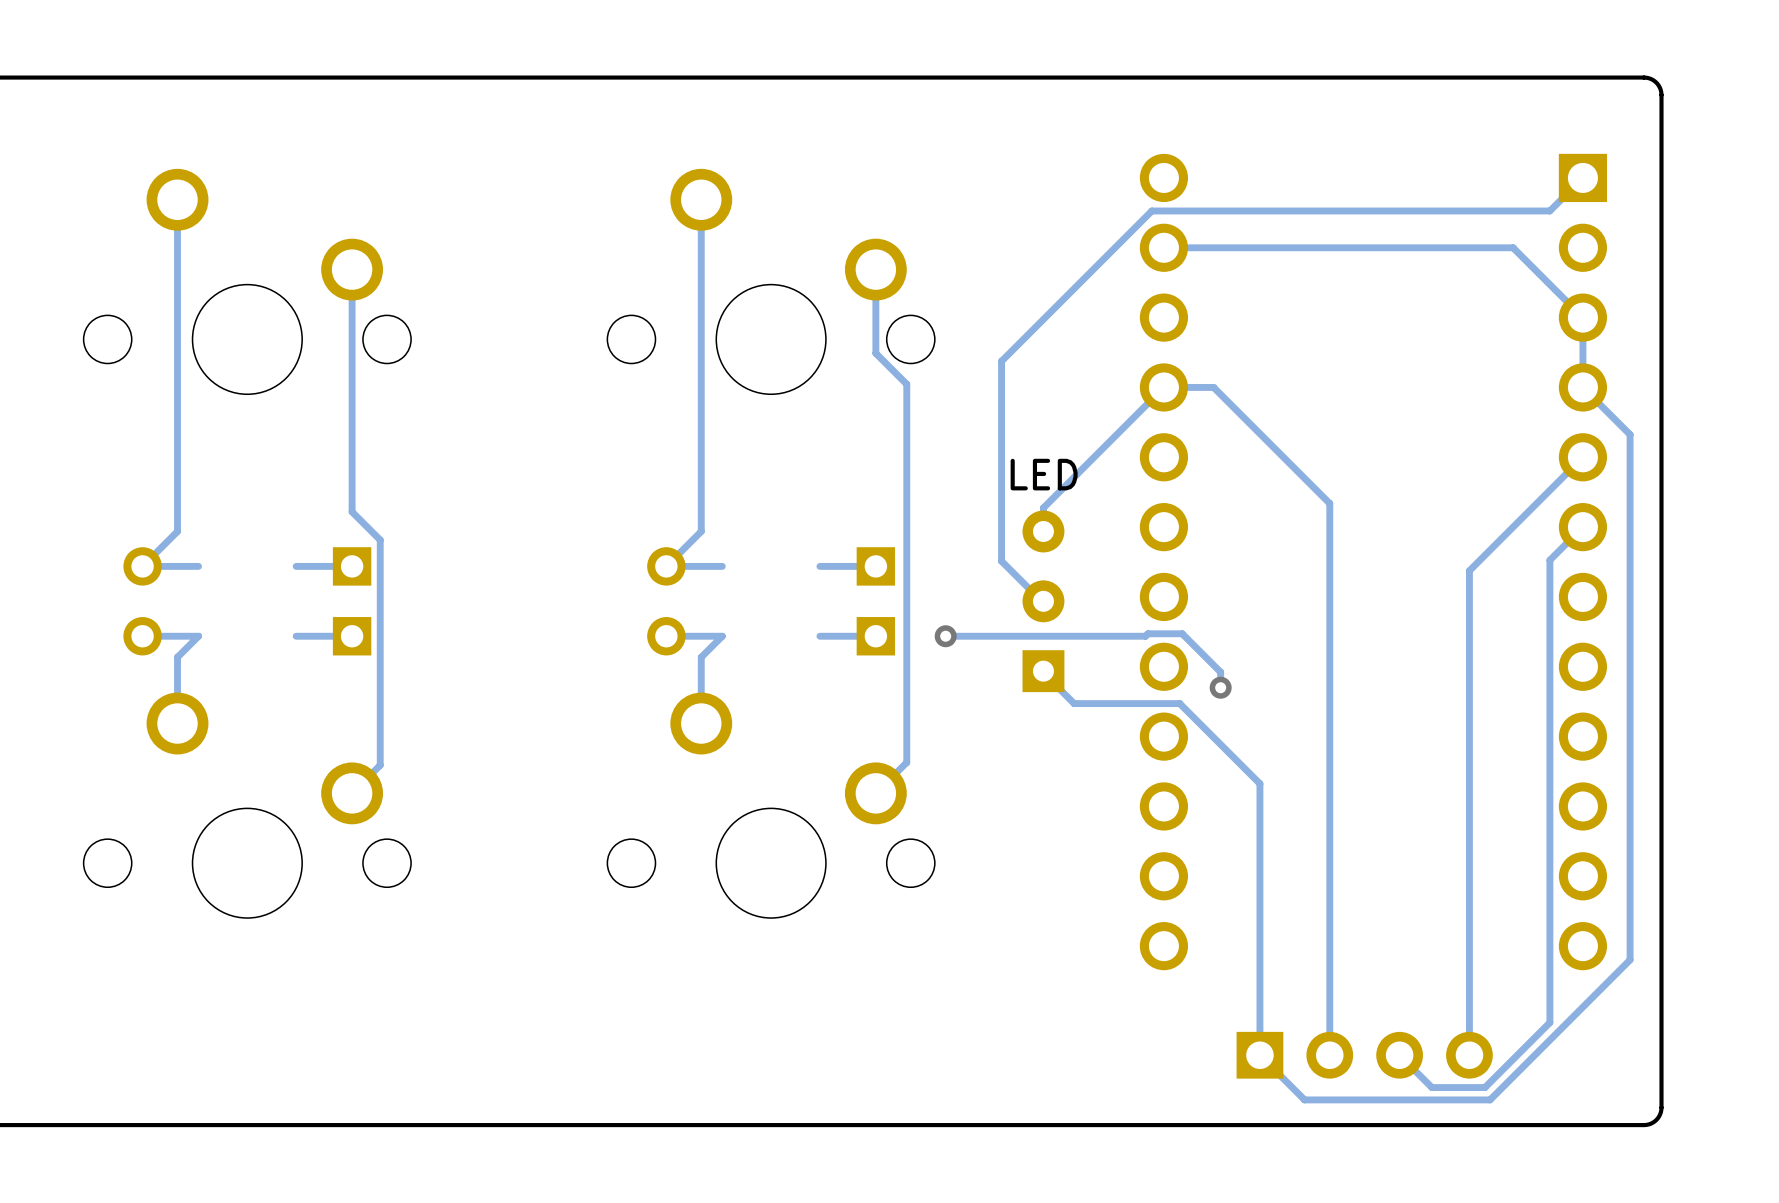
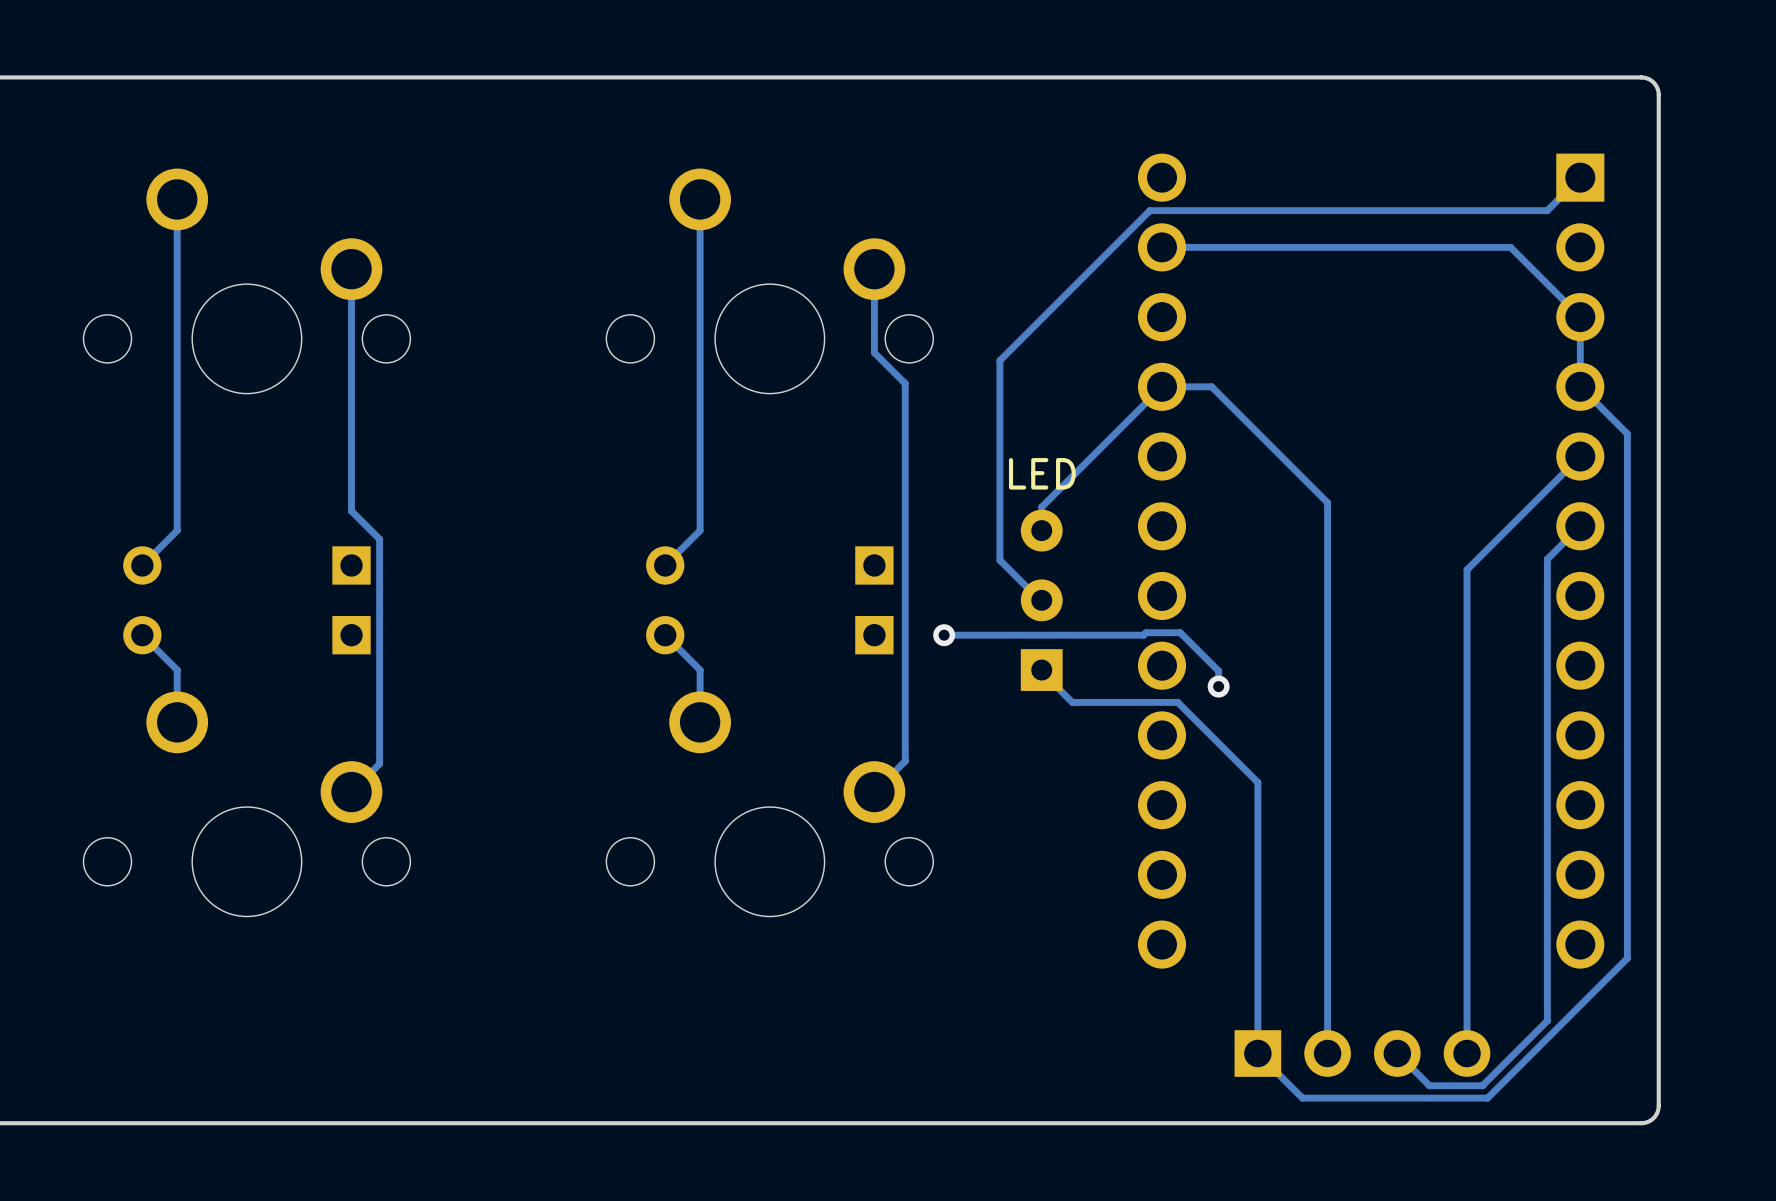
track: (198, 566) (142, 566) -> none
track: (352, 566) (296, 566) -> none
track: (722, 566) (666, 566) -> none
track: (875, 566) (819, 566) -> none
track: (142, 636) (198, 636) (177, 657) (177, 671) -> (142, 635) (177, 670)
track: (352, 636) (296, 636) -> none
track: (666, 636) (722, 636) (701, 657) (701, 671) -> (665, 635) (700, 670)
track: (875, 636) (819, 636) -> none

